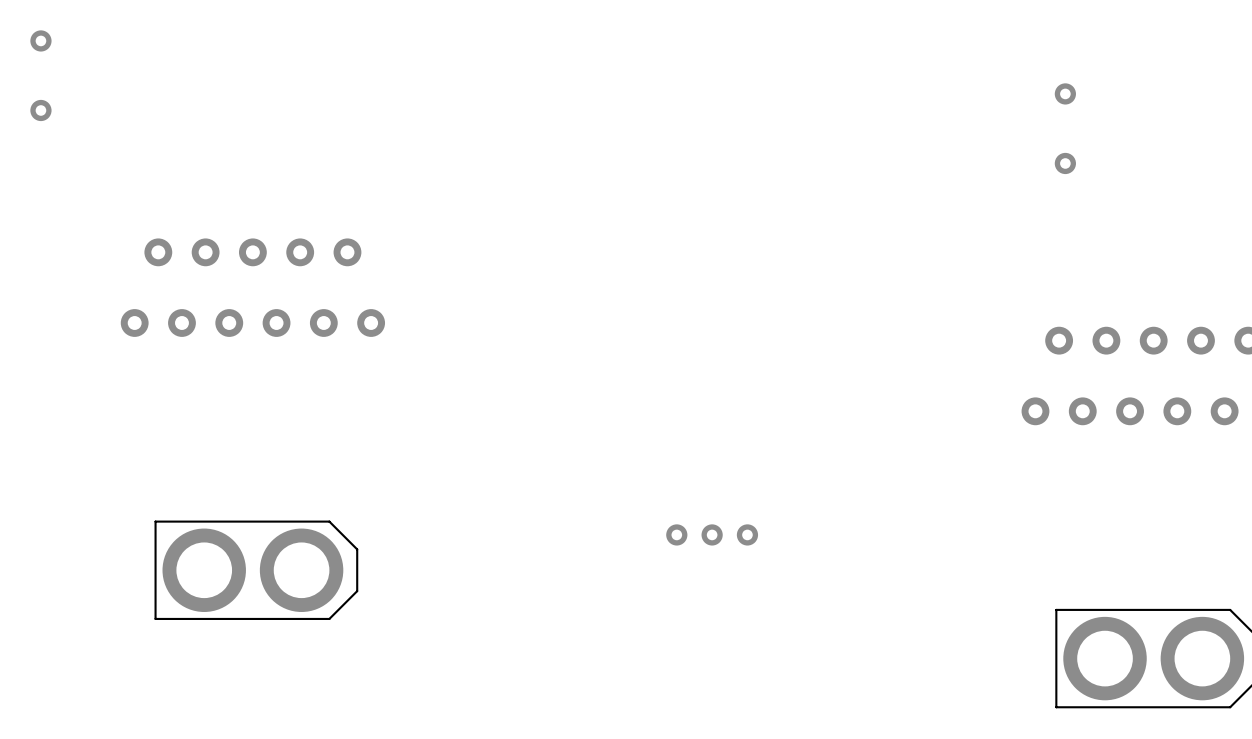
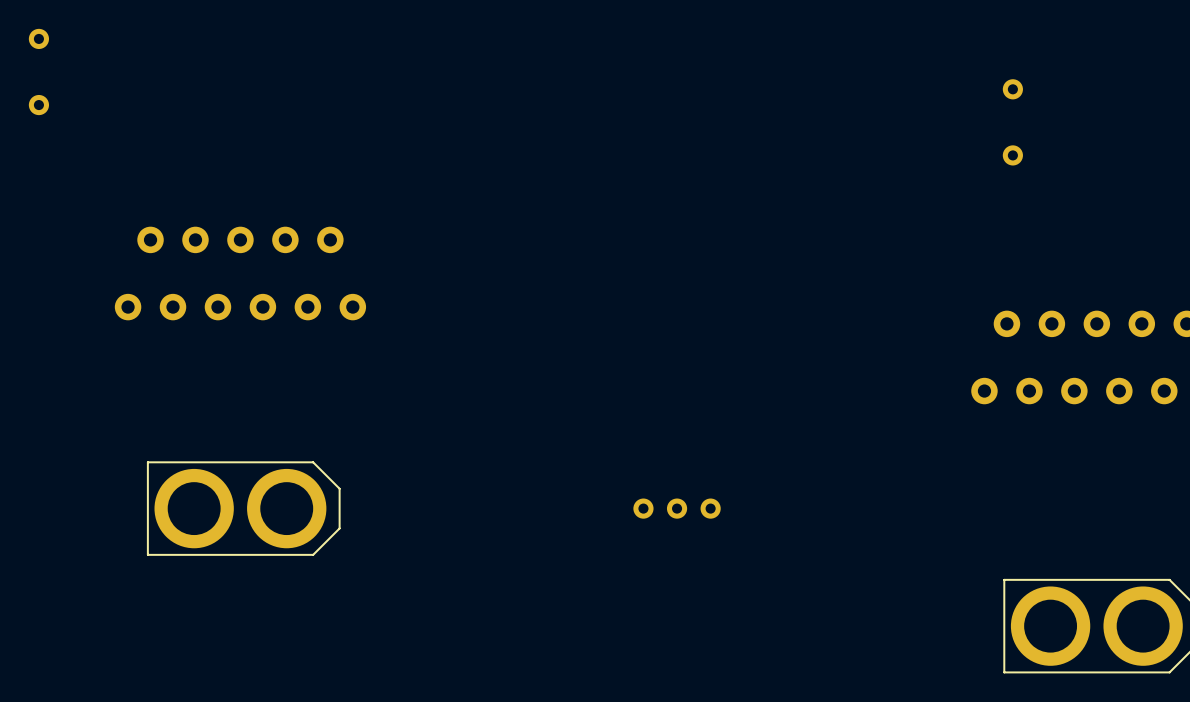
part position: (256, 570) -> (243, 508)

